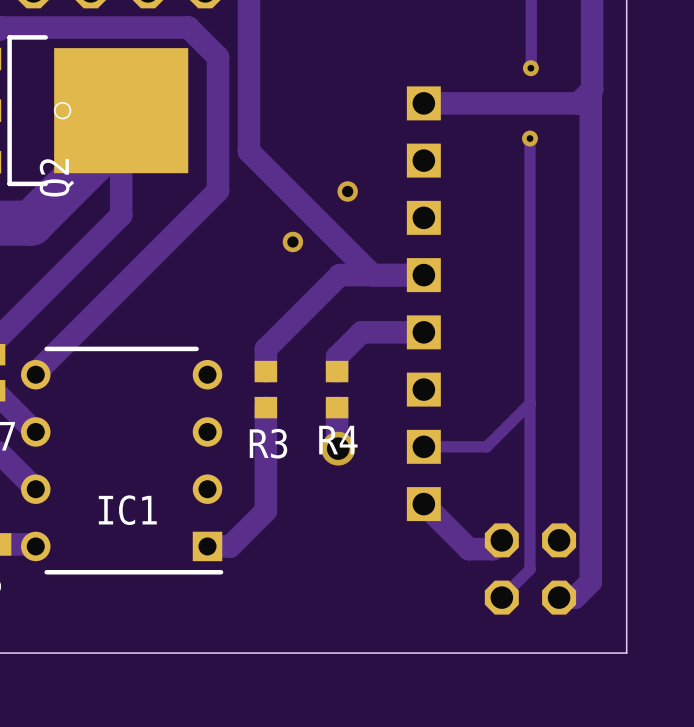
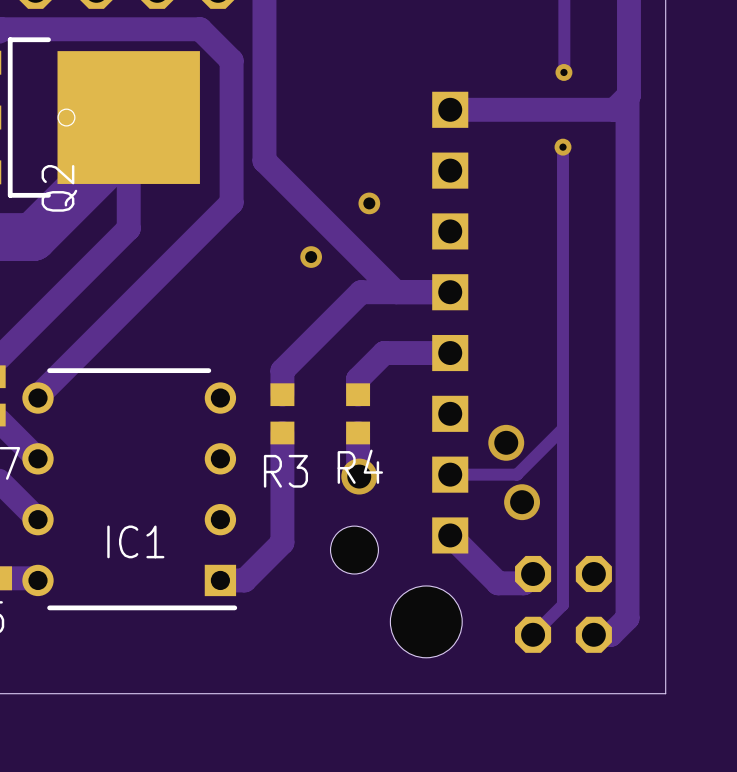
via: none -> (506, 442)
via: none -> (522, 502)
hole: none -> (354, 550)
hole: none -> (426, 621)

